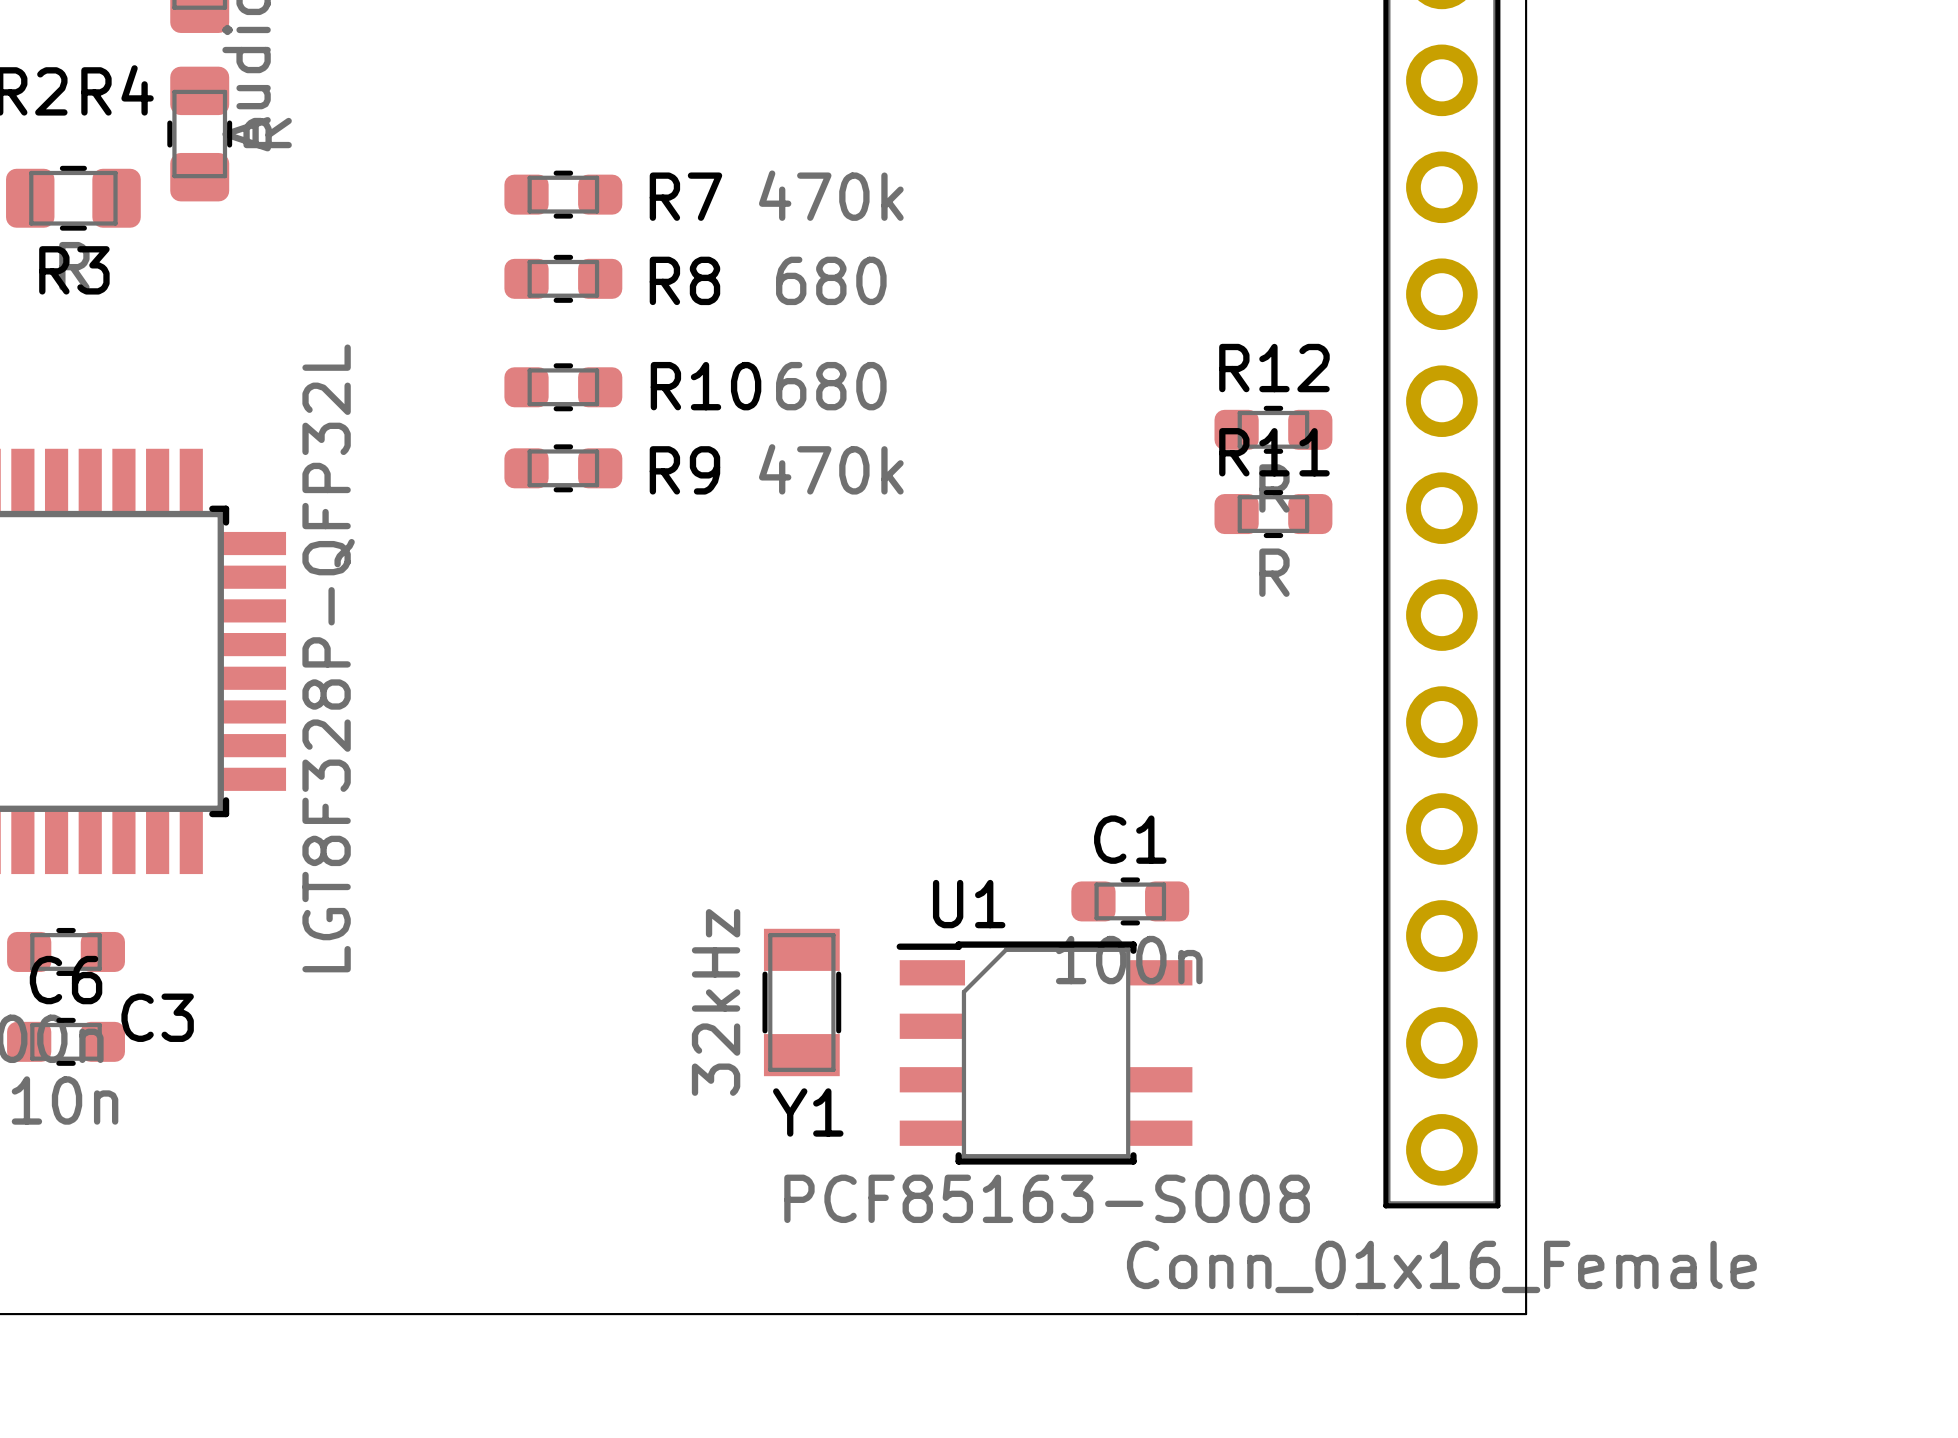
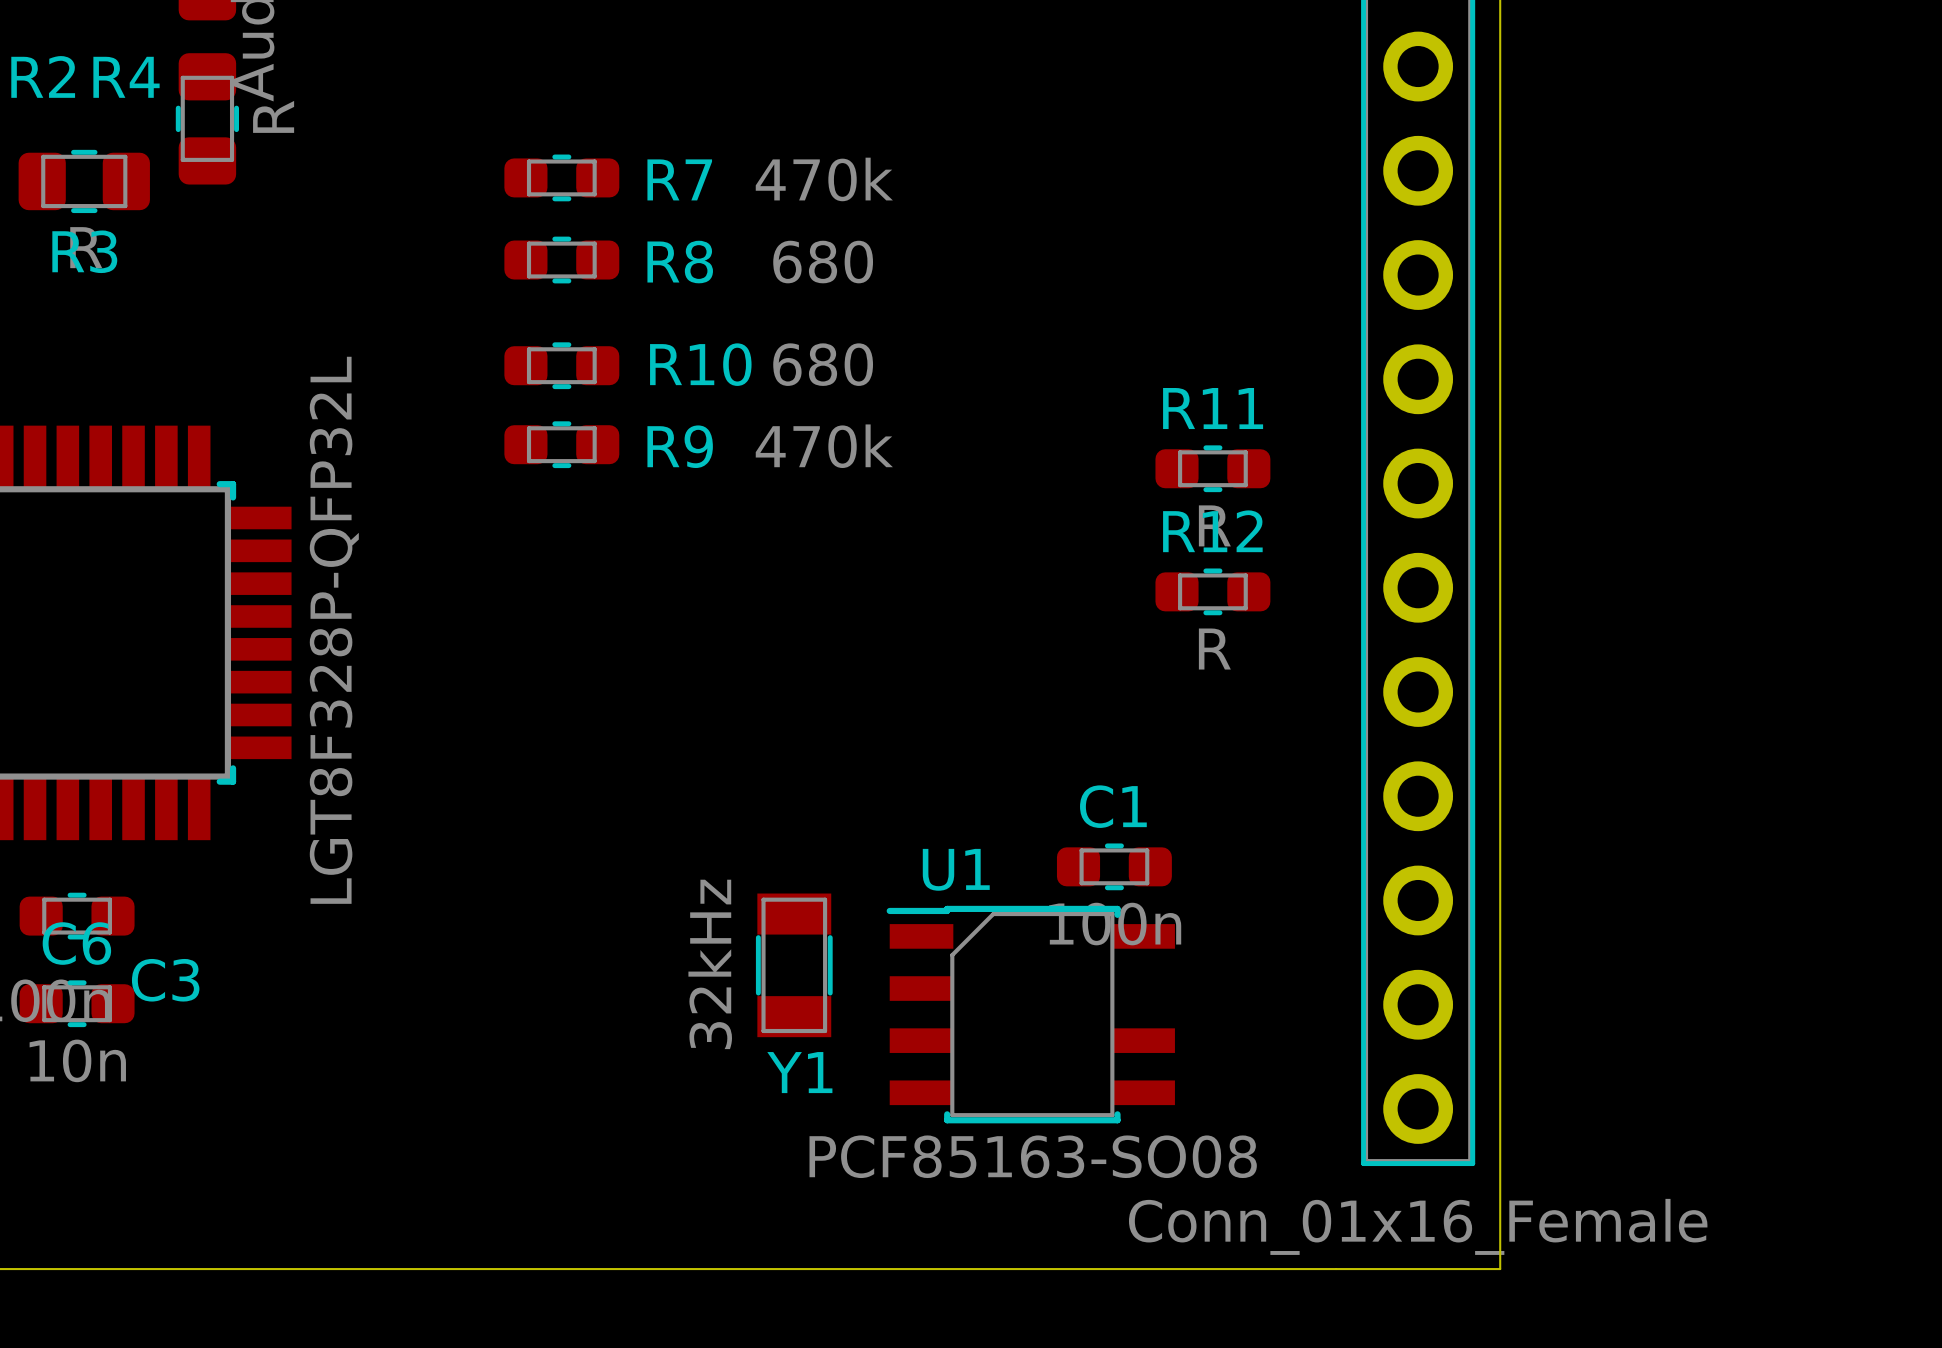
R12 position: (1273, 429) -> (1212, 591)
R11 position: (1273, 514) -> (1212, 468)

